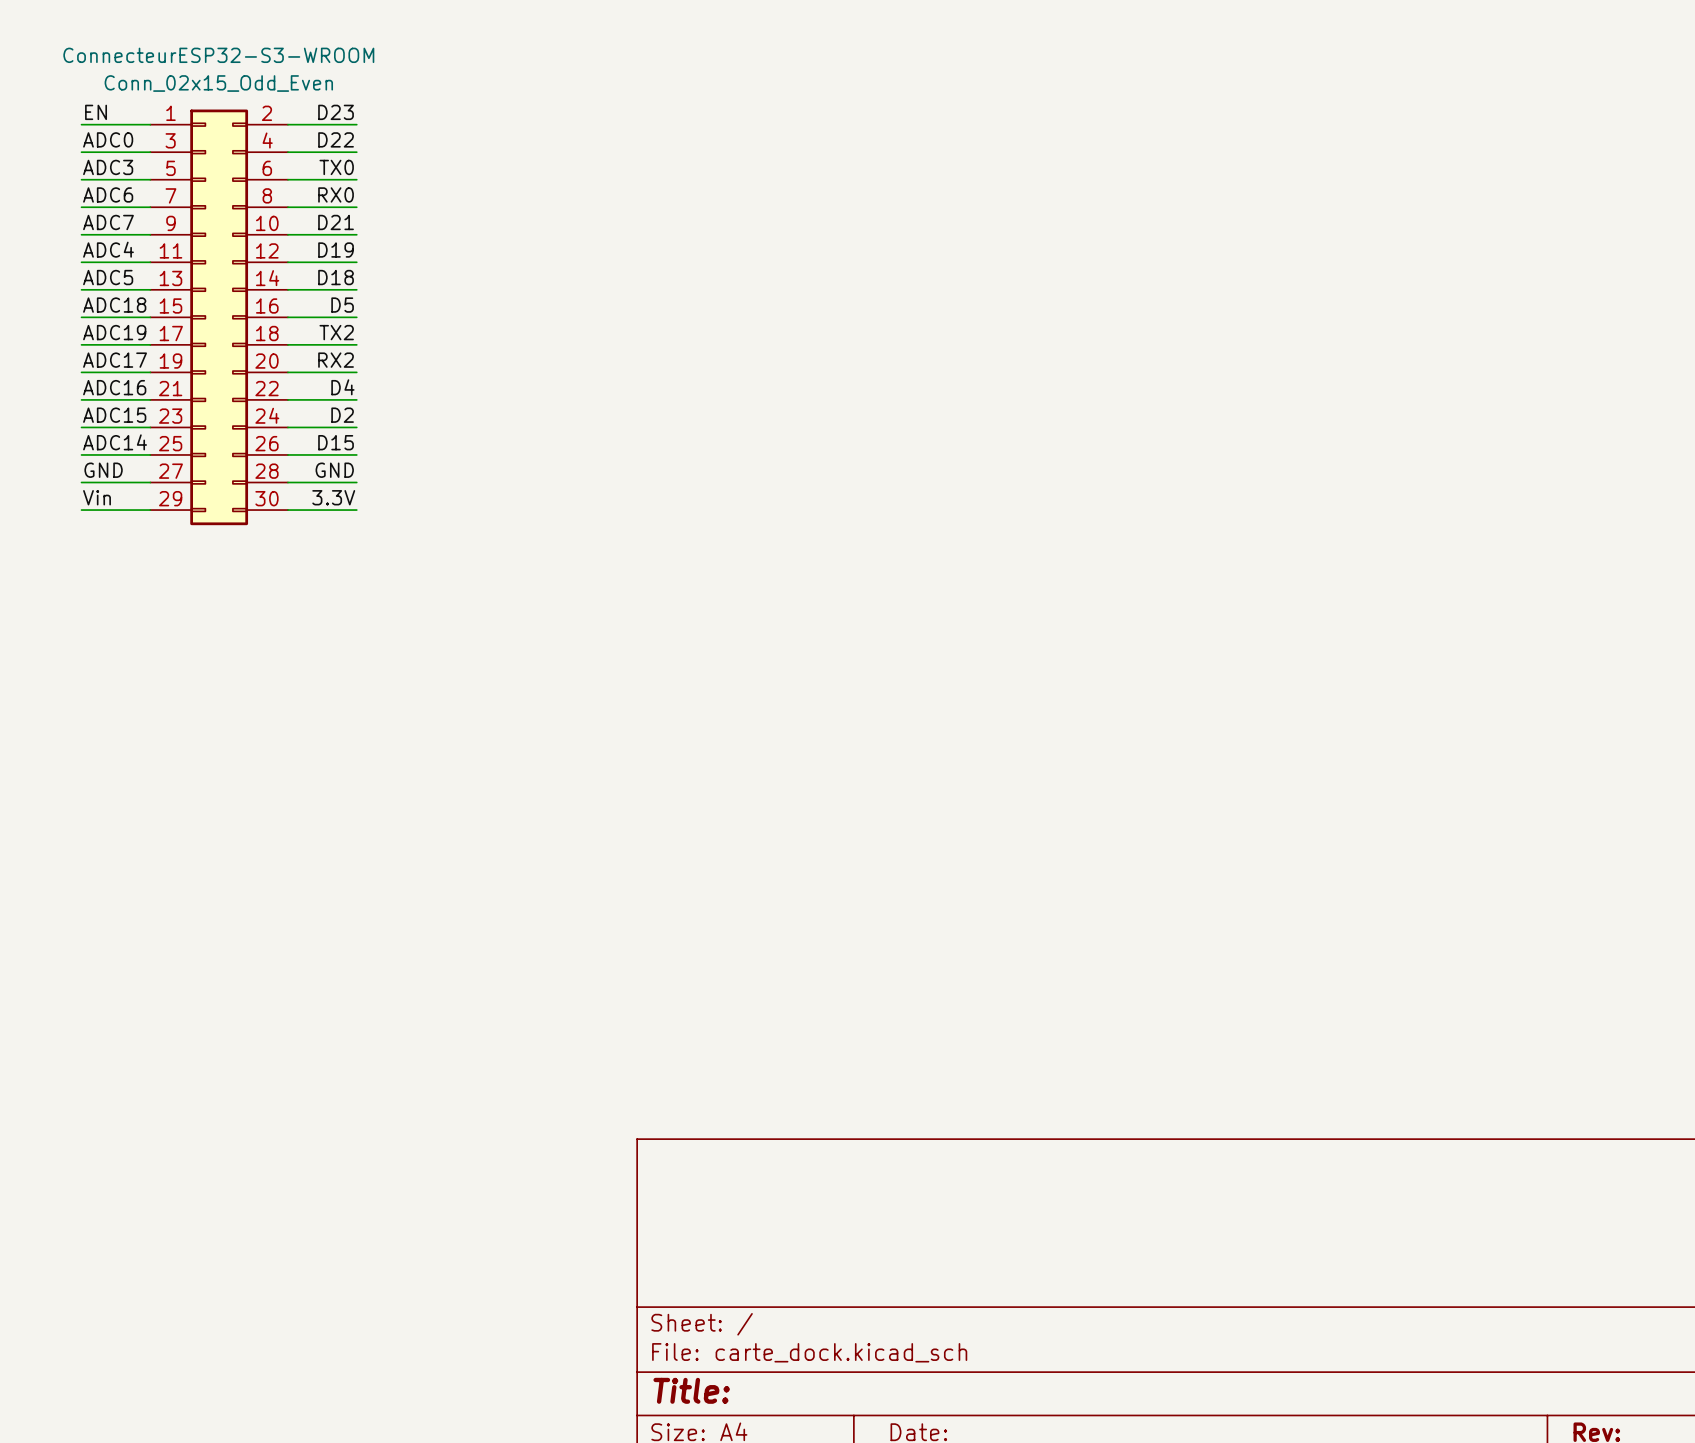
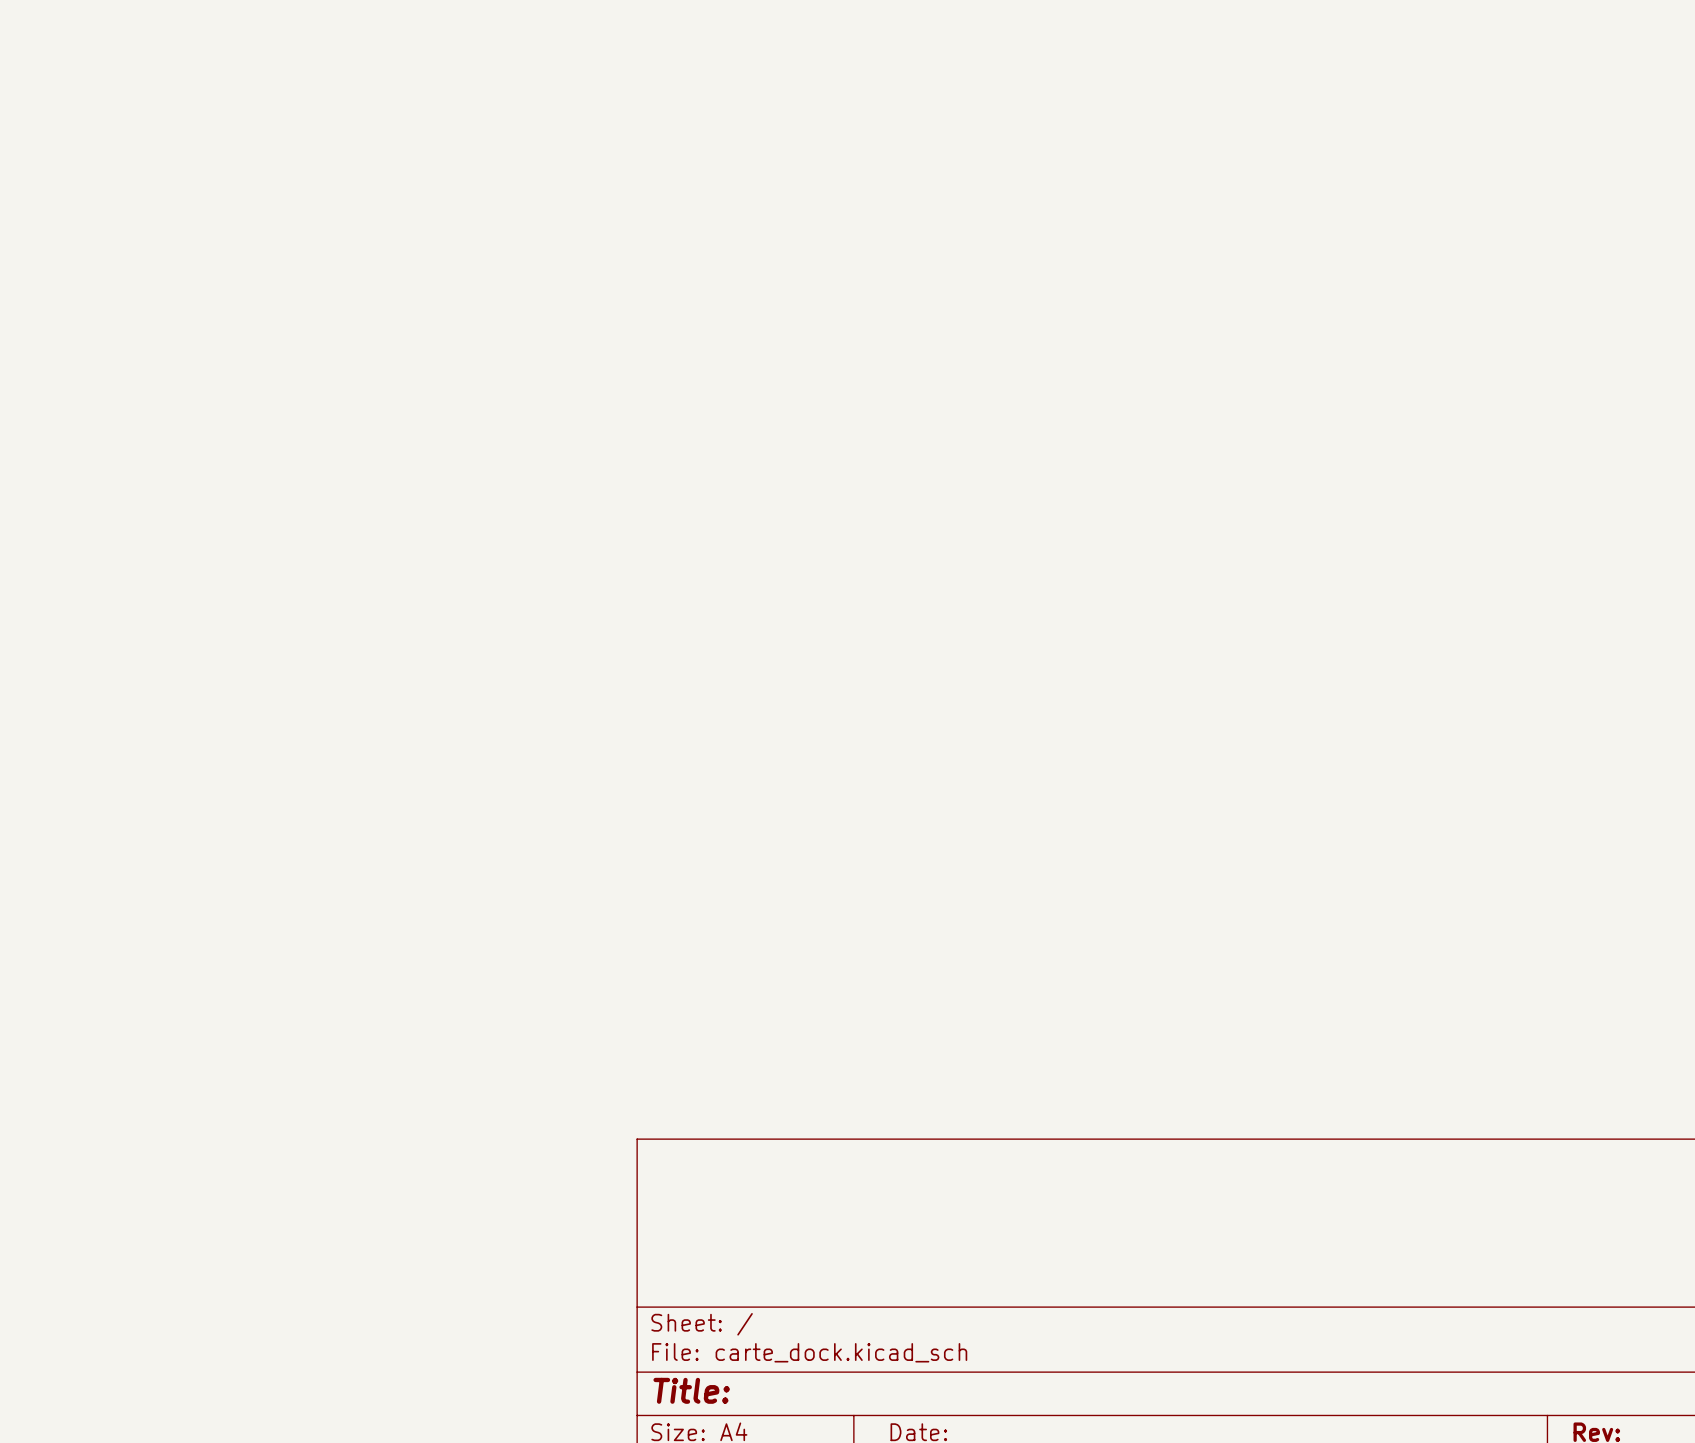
label: EN (96, 112) -> none
label: D23 (336, 112) -> none
wire: (81, 124) (150, 124) -> none
wire: (287, 124) (356, 124) -> none
label: ADC0 (108, 139) -> none
label: D22 (336, 139) -> none
wire: (81, 152) (150, 152) -> none
wire: (287, 152) (356, 152) -> none
label: ADC3 (108, 167) -> none
label: TX0 (336, 167) -> none
wire: (81, 179) (150, 179) -> none
wire: (287, 179) (356, 179) -> none
label: ADC6 (108, 194) -> none
label: RX0 (336, 194) -> none
wire: (81, 207) (150, 207) -> none
wire: (287, 207) (356, 207) -> none
label: ADC7 (108, 222) -> none
label: D21 (336, 222) -> none
wire: (81, 234) (150, 234) -> none
wire: (287, 234) (356, 234) -> none
label: ADC4 (108, 249) -> none
label: D19 (336, 250) -> none
wire: (81, 262) (150, 262) -> none
wire: (287, 262) (356, 262) -> none
label: ADC5 (108, 277) -> none
label: D18 (336, 277) -> none
wire: (81, 289) (150, 289) -> none
wire: (287, 289) (356, 289) -> none
label: ADC18 (114, 305) -> none
label: D5 (342, 305) -> none
wire: (81, 317) (150, 317) -> none
ConnecteurESP32-S3-WROOM: Conn_02x15_Odd_Even (219, 317) -> none
wire: (287, 317) (356, 317) -> none
label: ADC19 (114, 332) -> none
label: TX2 (336, 332) -> none
wire: (81, 344) (150, 344) -> none
wire: (287, 344) (356, 344) -> none
label: ADC17 (115, 360) -> none
label: RX2 (336, 360) -> none
wire: (81, 372) (150, 372) -> none
wire: (287, 372) (356, 372) -> none
label: ADC16 (114, 387) -> none
label: D4 (342, 387) -> none
wire: (81, 399) (150, 399) -> none
wire: (287, 399) (356, 399) -> none
label: ADC15 (114, 415) -> none
label: D2 (342, 415) -> none
wire: (81, 427) (150, 427) -> none
wire: (287, 427) (356, 427) -> none
label: ADC14 (115, 442) -> none
label: D15 (336, 442) -> none
wire: (81, 454) (150, 454) -> none
wire: (287, 454) (356, 454) -> none
label: GND (103, 470) -> none
label: GND (334, 470) -> none
wire: (81, 482) (150, 482) -> none
wire: (287, 482) (356, 482) -> none
label: Vin (97, 497) -> none
label: 3.3V (333, 497) -> none
wire: (81, 510) (150, 510) -> none
wire: (287, 510) (356, 510) -> none

